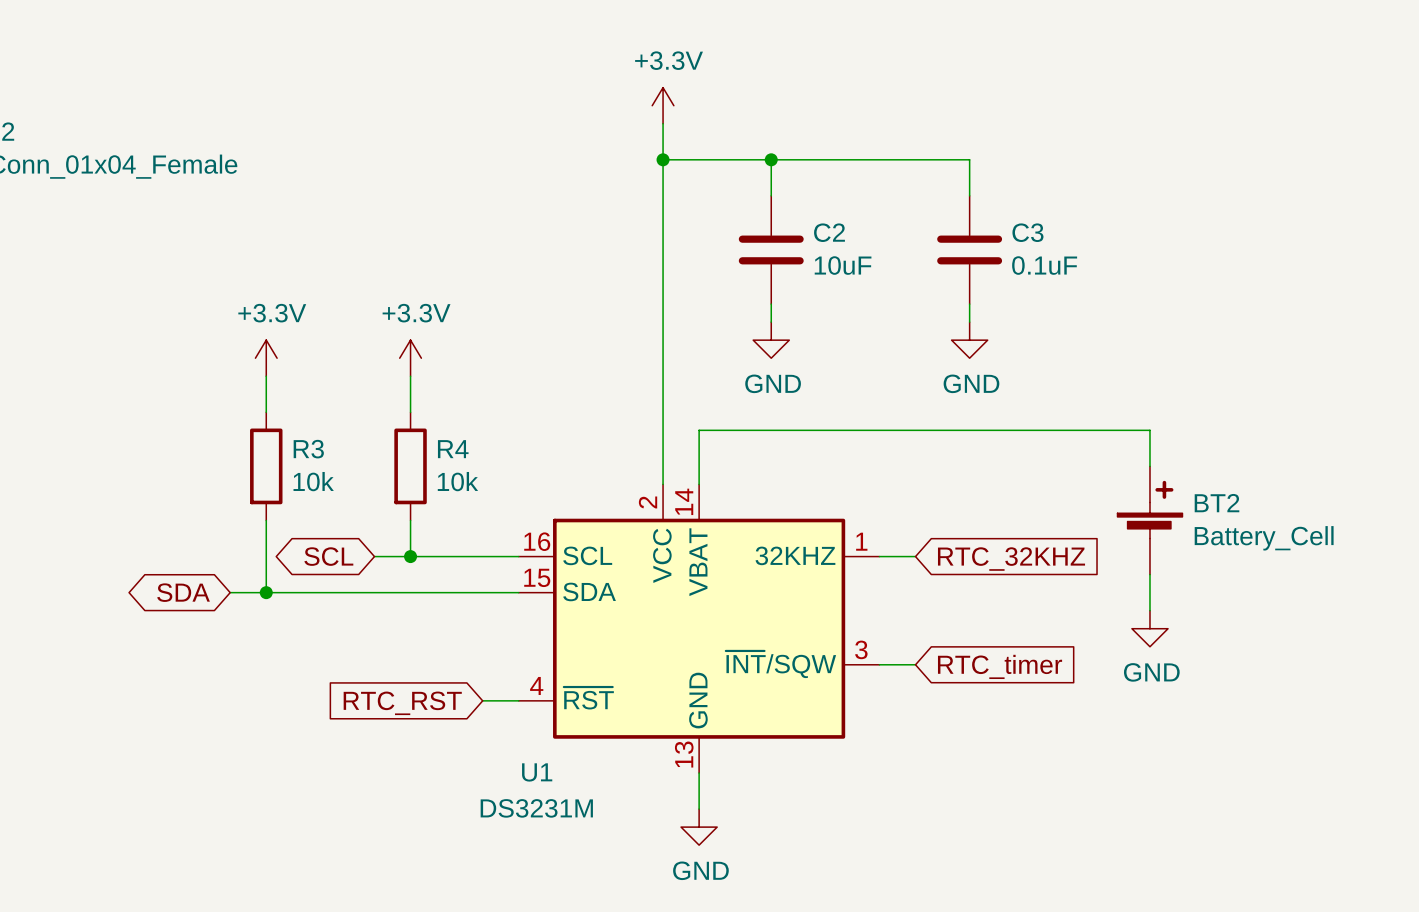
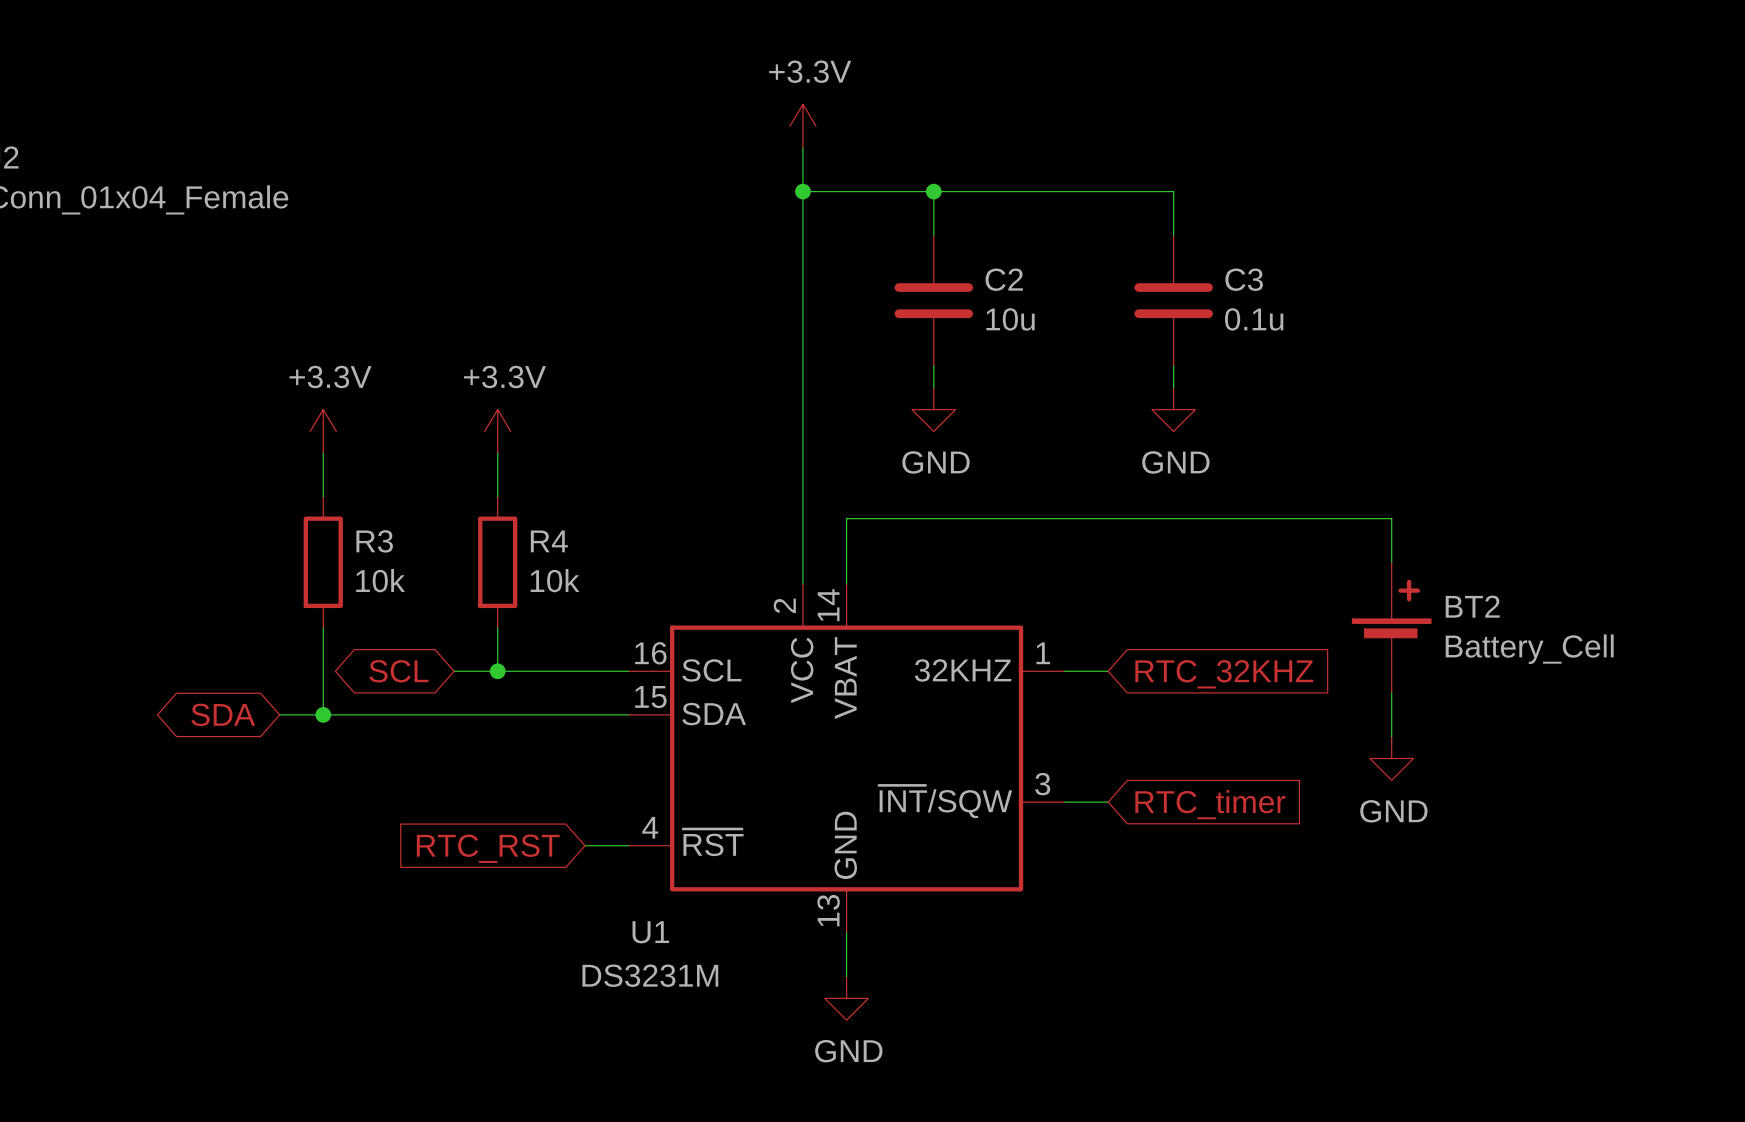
C2 value: 10uF (843, 265) -> 10u (1010, 319)
C3 value: 0.1uF (1044, 265) -> 0.1u (1254, 319)

